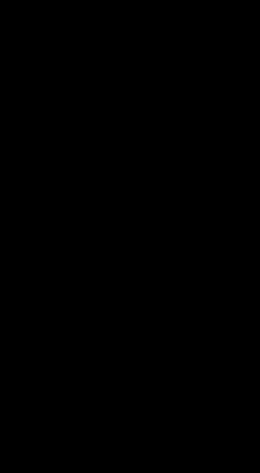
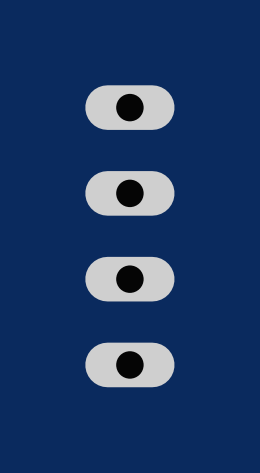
part: none -> (129, 236)

